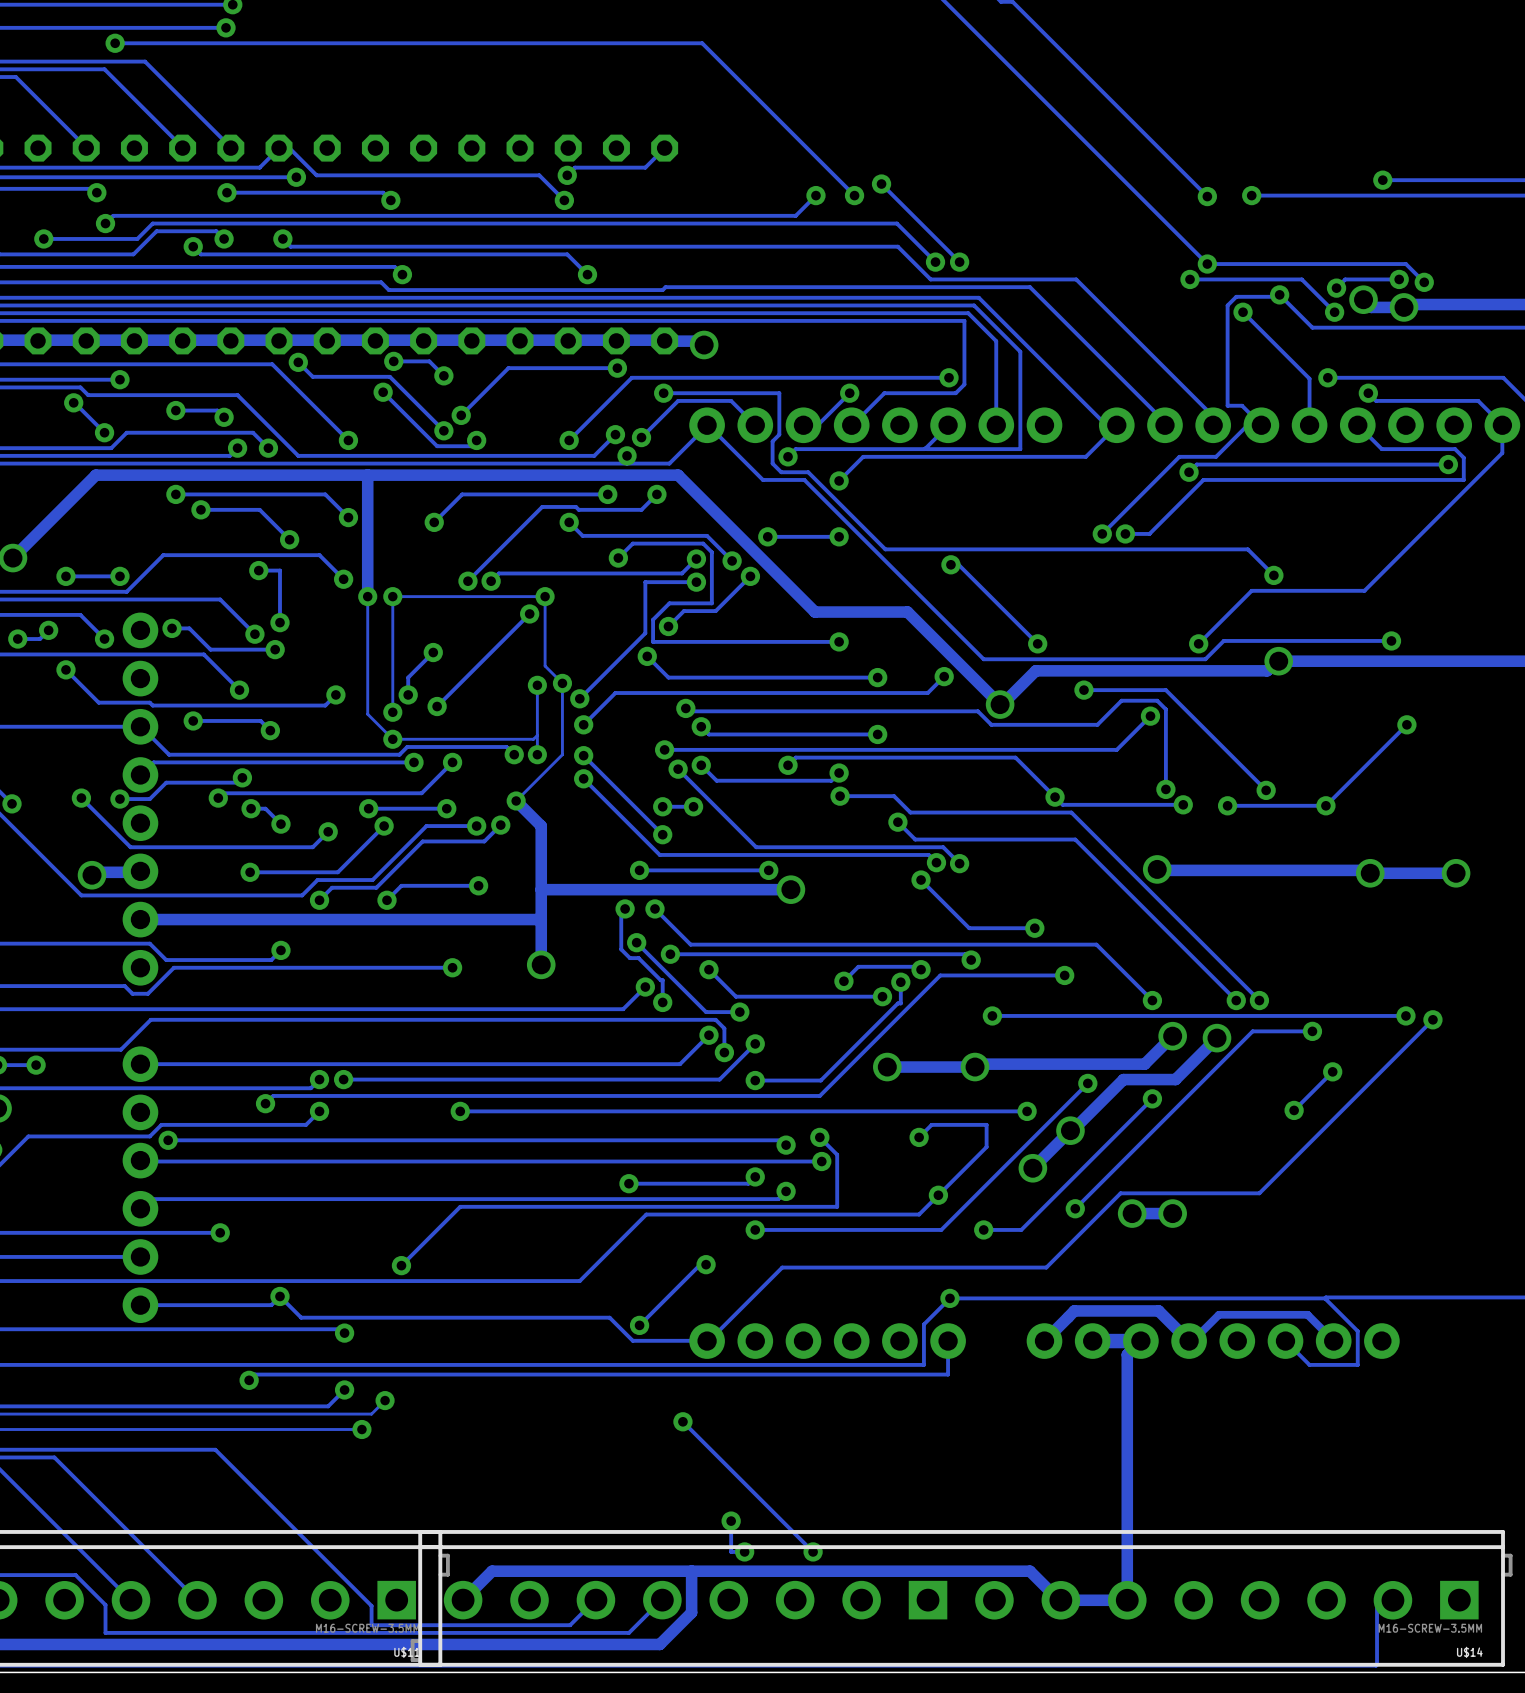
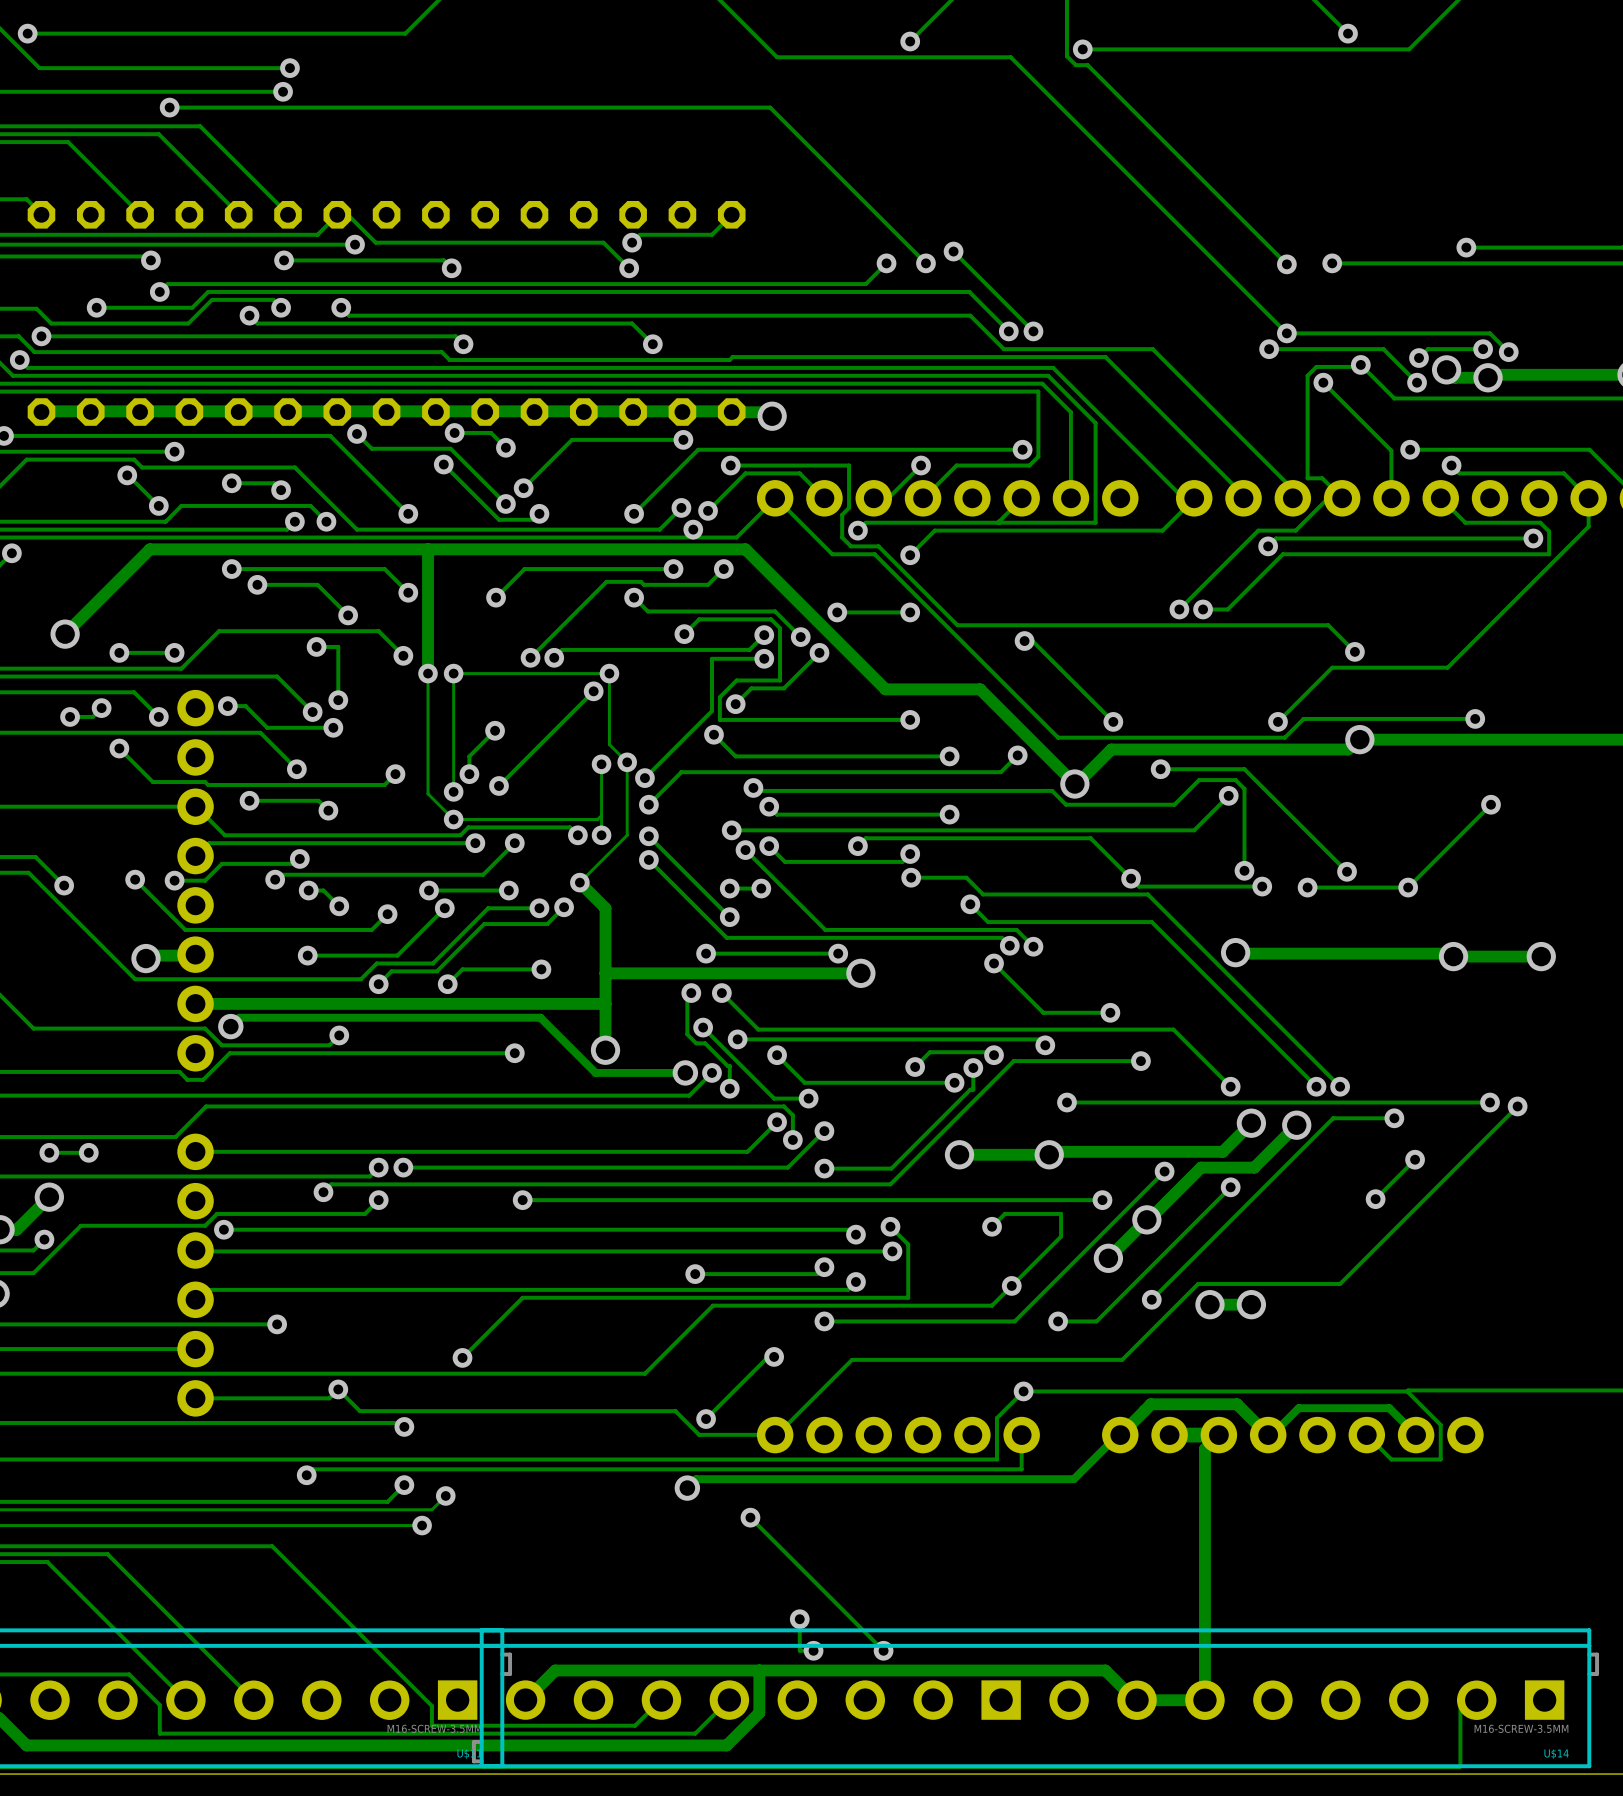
track: none -> (230, 1026) (239, 1017) (540, 1017) (595, 1072) (685, 1072)
via: none -> (230, 1026)
via: none -> (685, 1072)
track: none -> (1120, 1435) (1073, 1479) (696, 1479) (687, 1488)
via: none -> (687, 1488)

